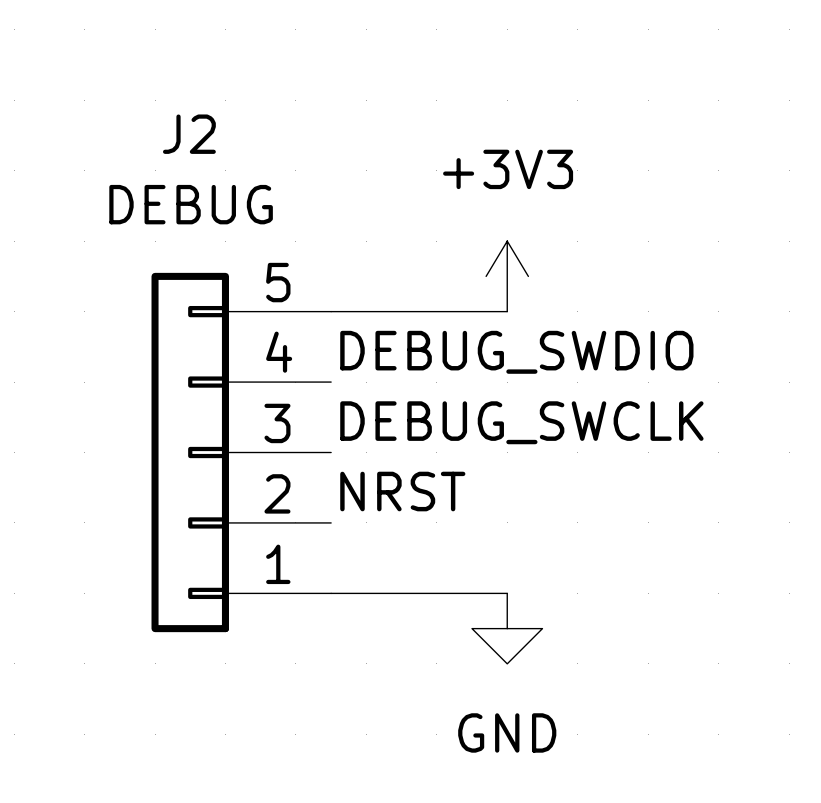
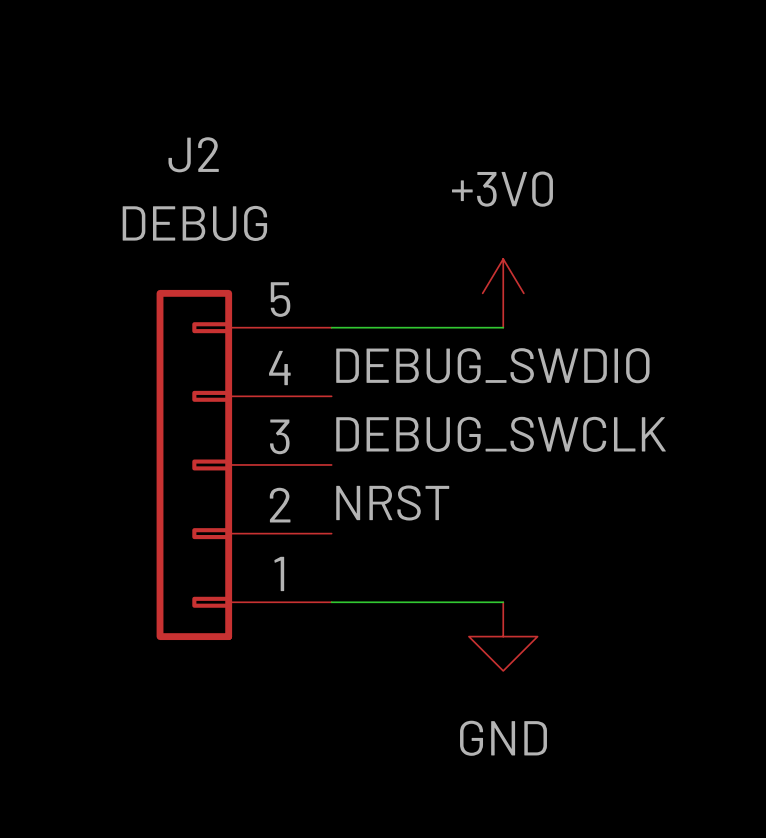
power symbol: +3V3 (507, 276) -> +3V0 (503, 293)

